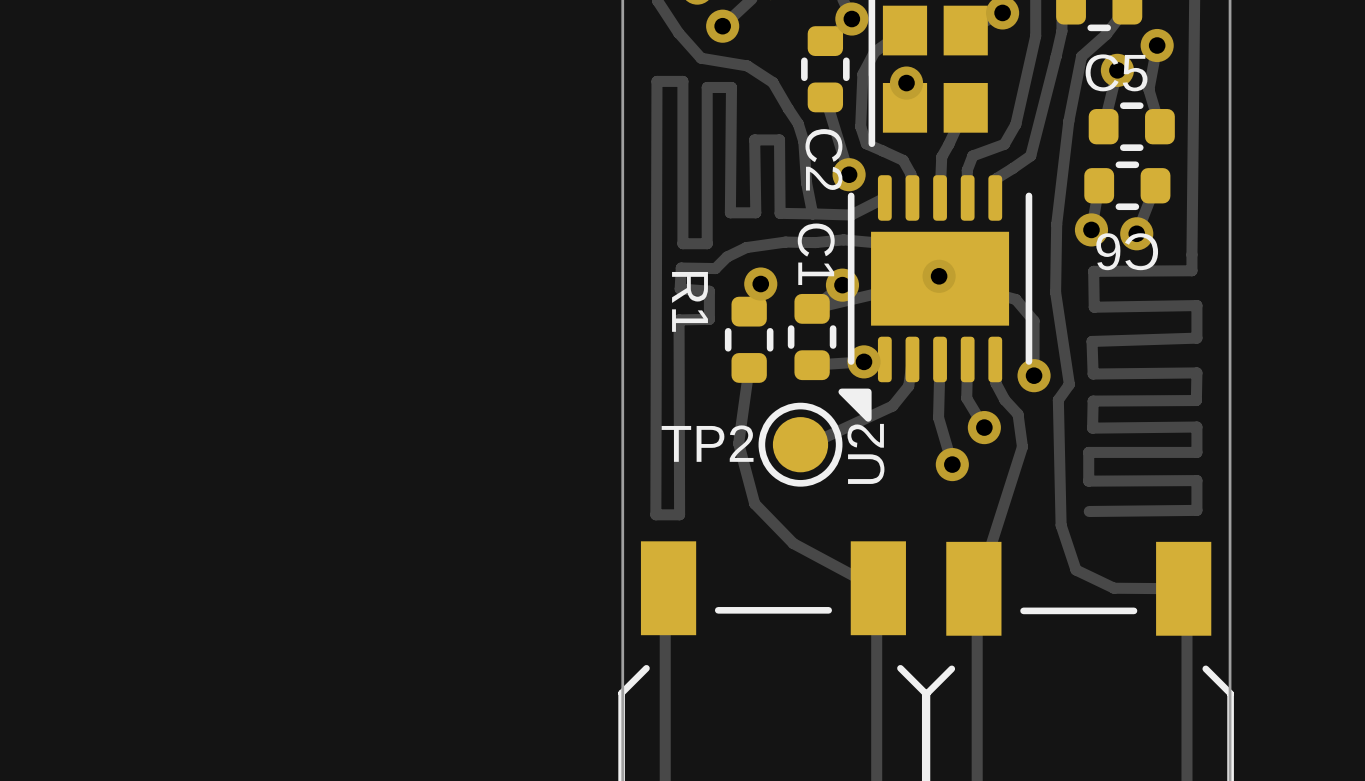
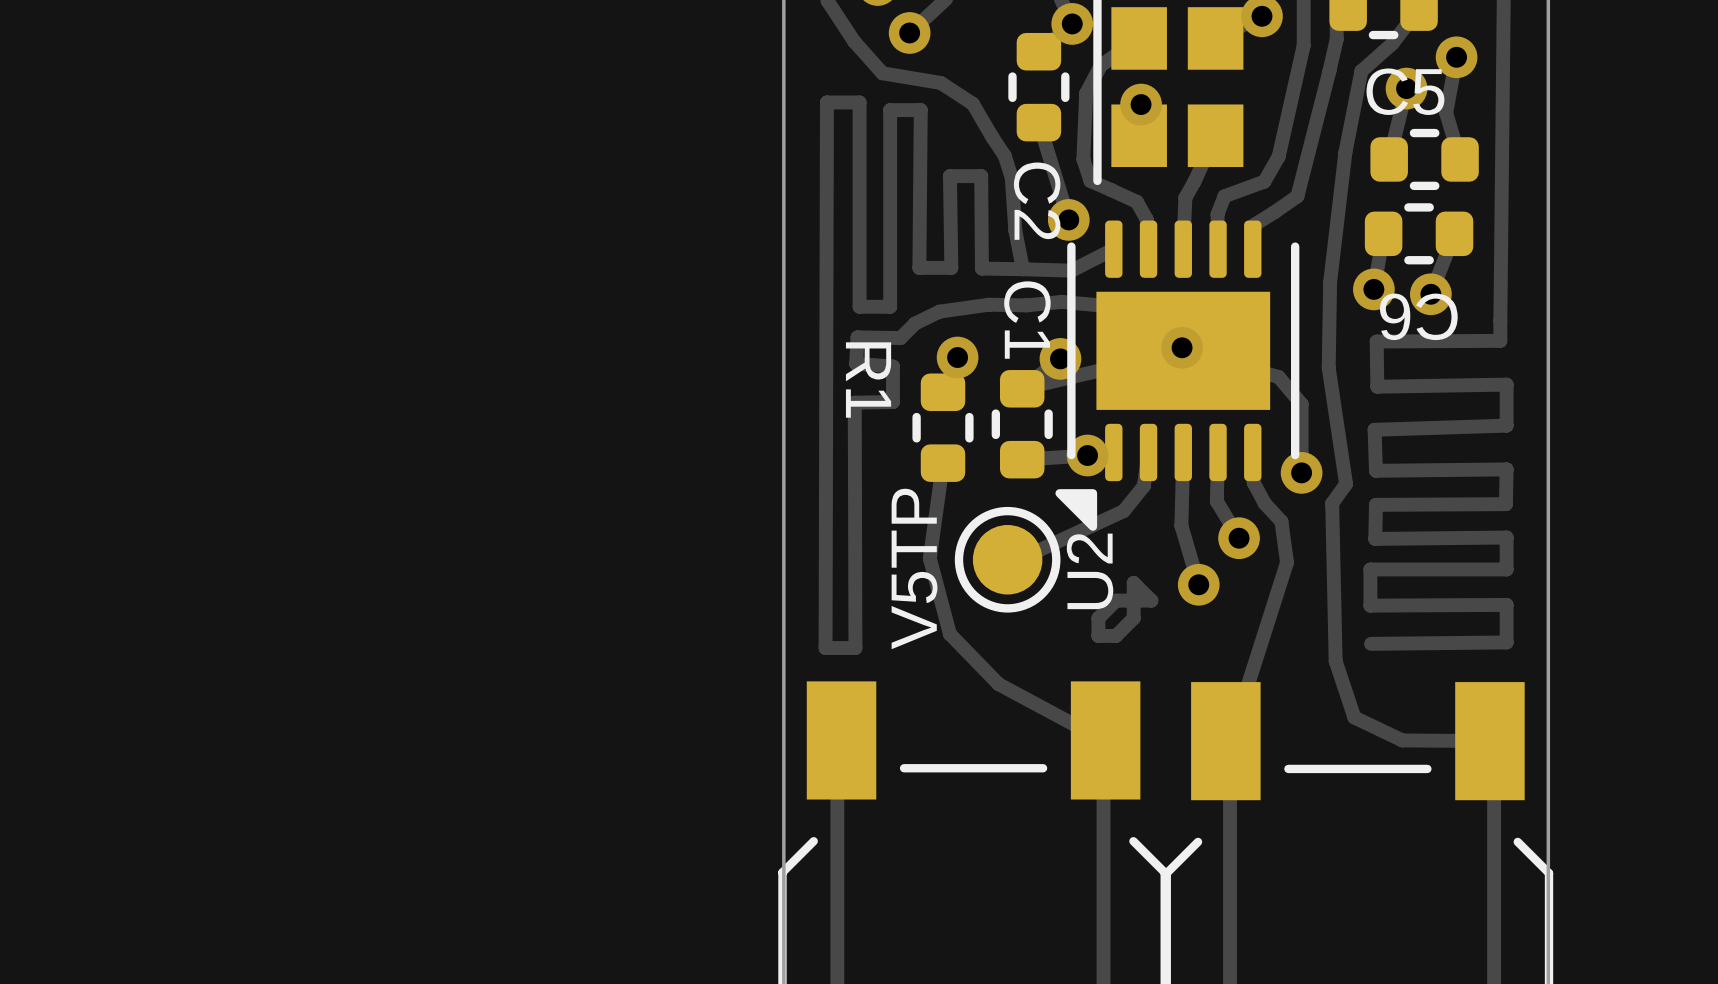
TP2 name: TP2 (707, 443) -> none
TP2 value: none -> V5TP (914, 568)
track: none -> (1133, 582) (1151, 600) (1116, 600) (1098, 618) (1098, 635) (1116, 635) (1133, 618) (1133, 582)

